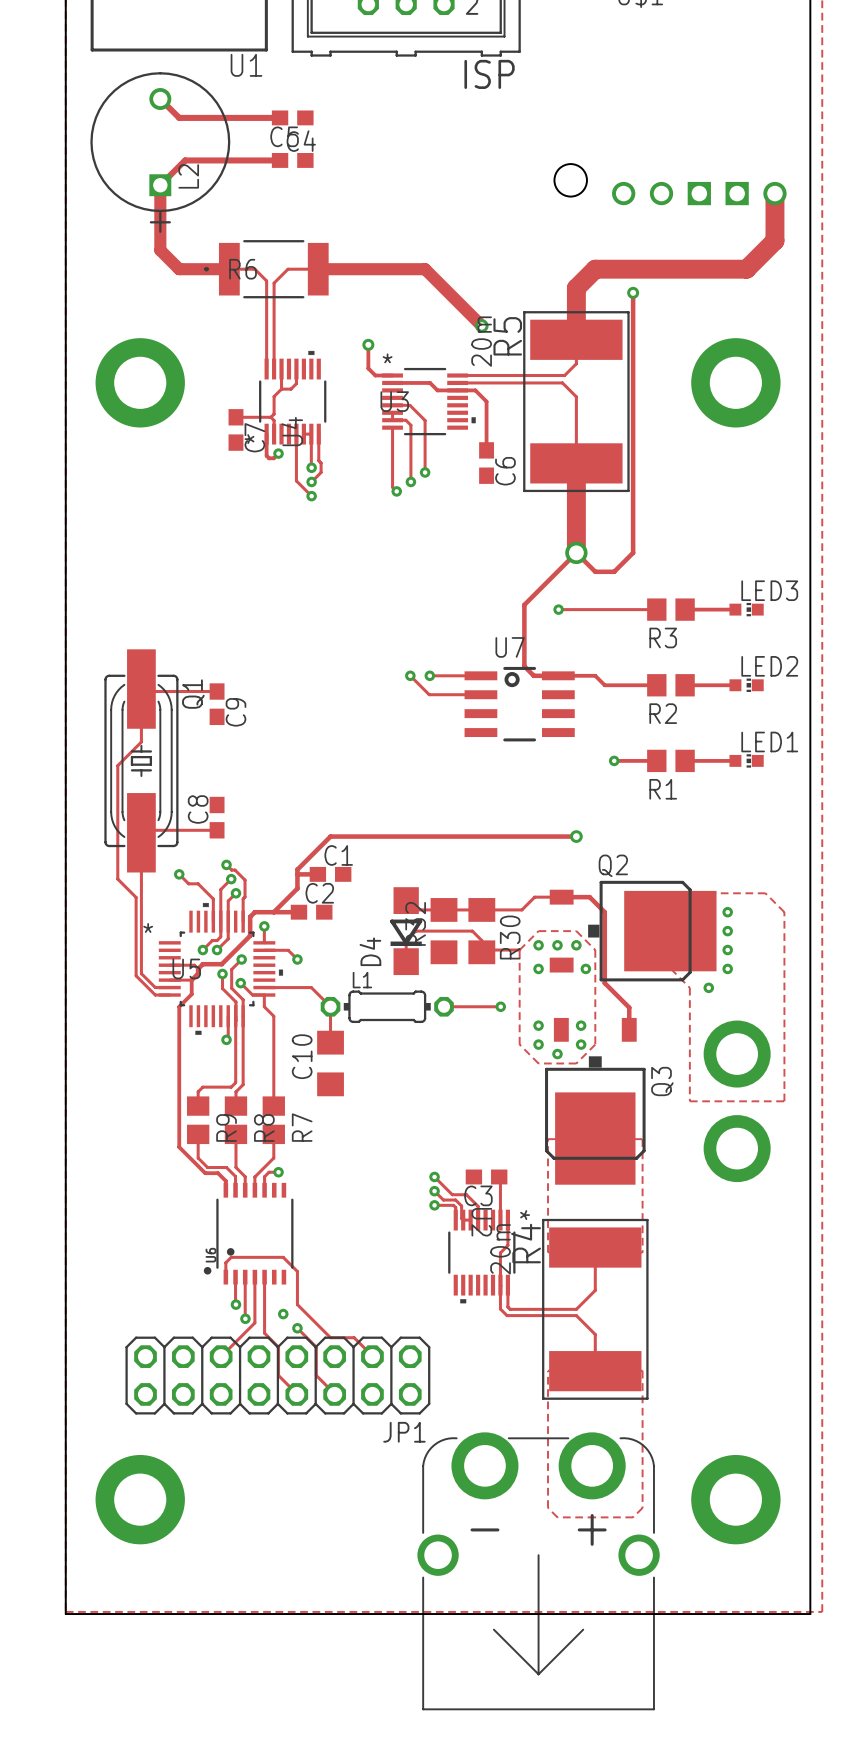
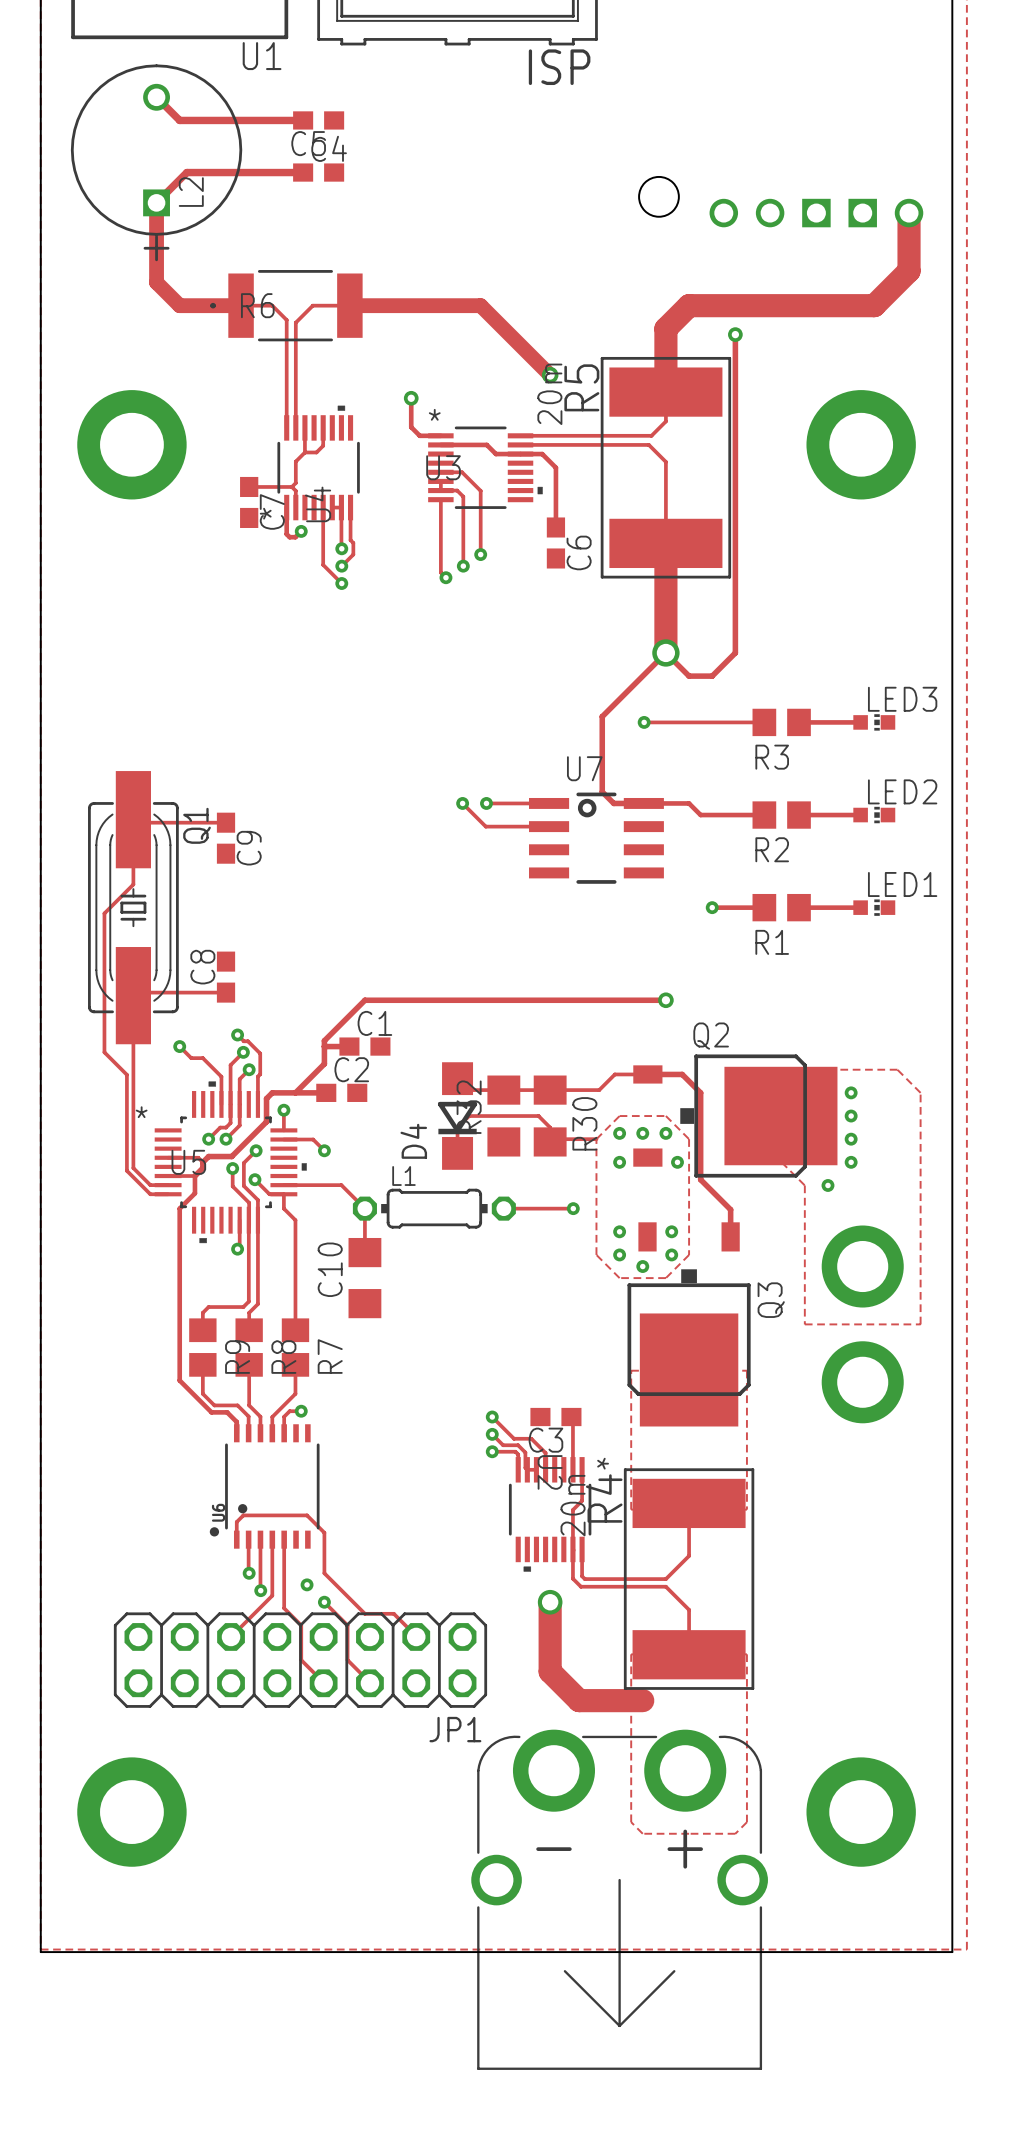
track: none -> (550, 1602) (550, 1671) (579, 1700) (642, 1700)
via: none -> (550, 1602)

